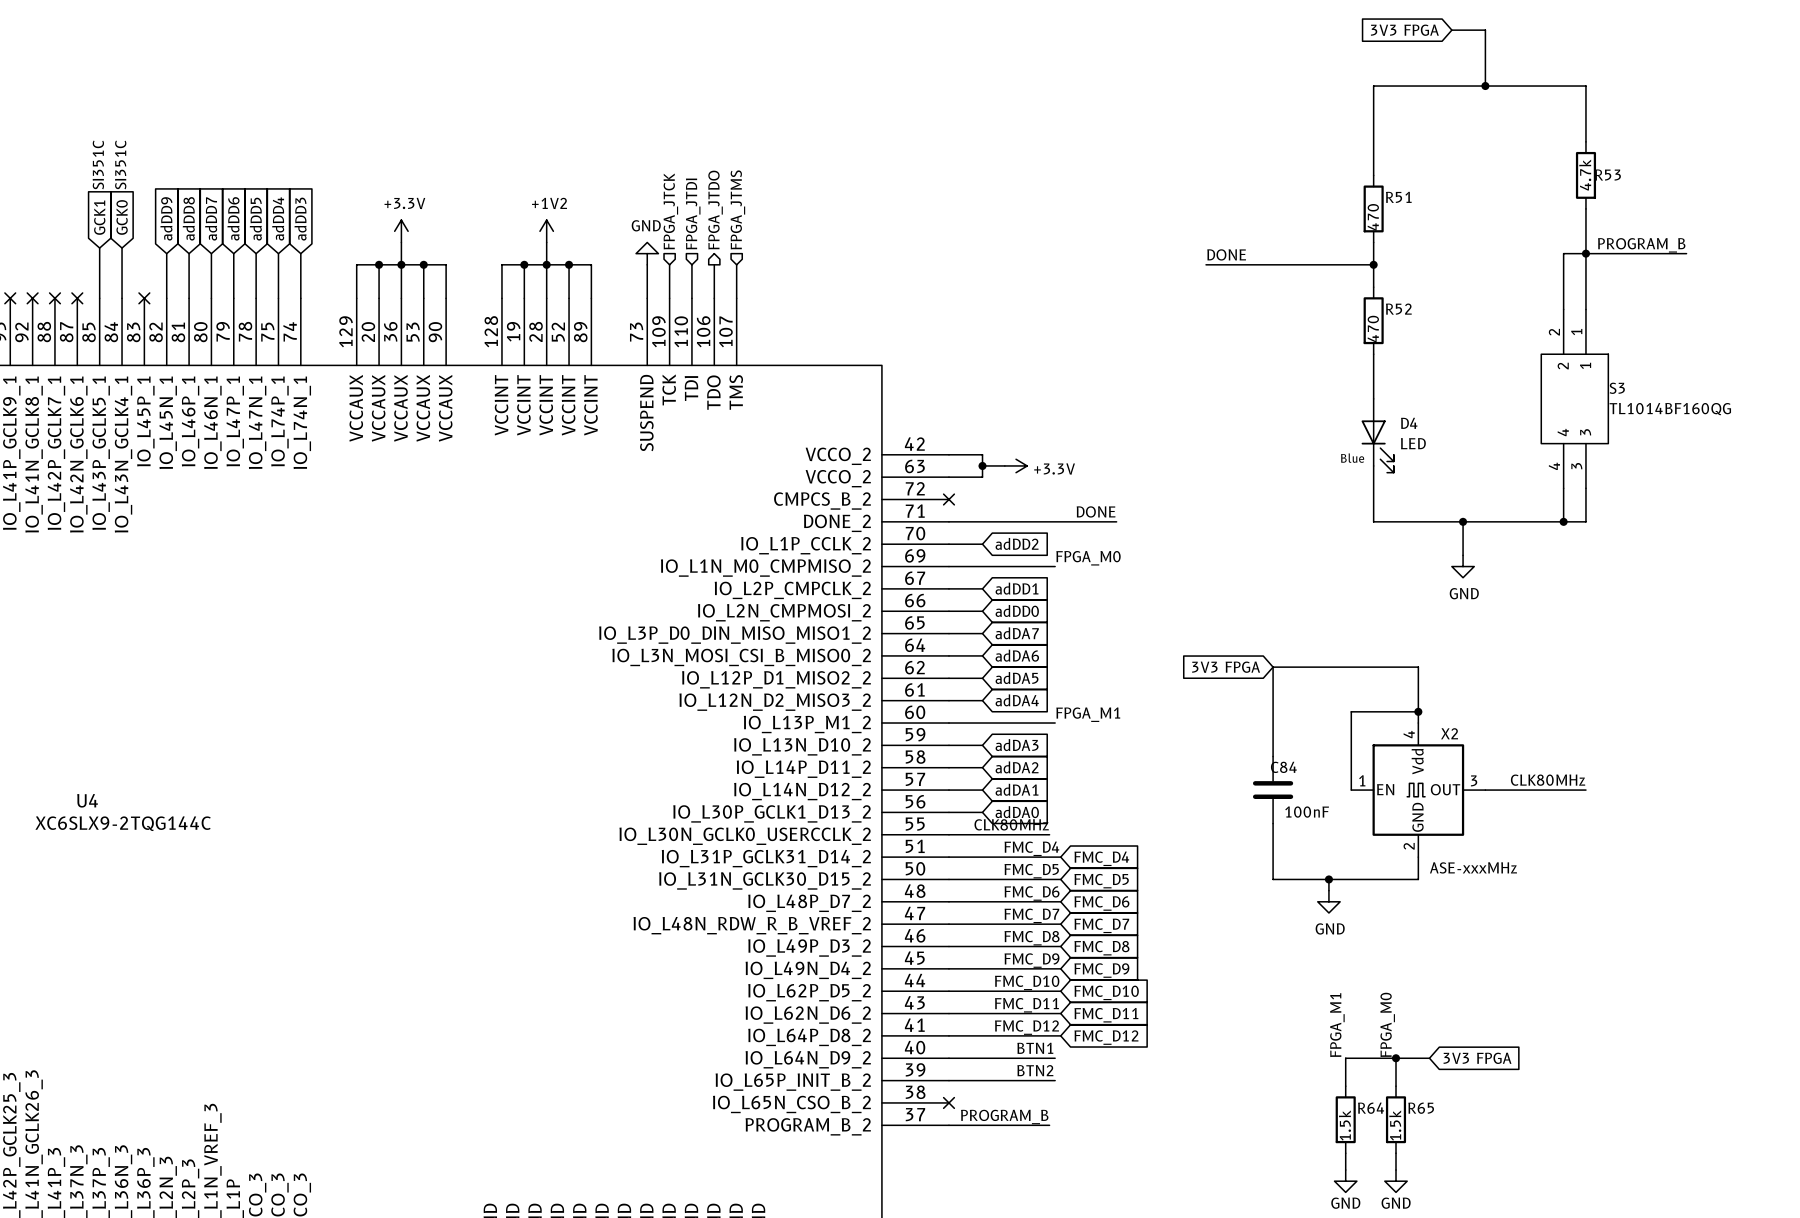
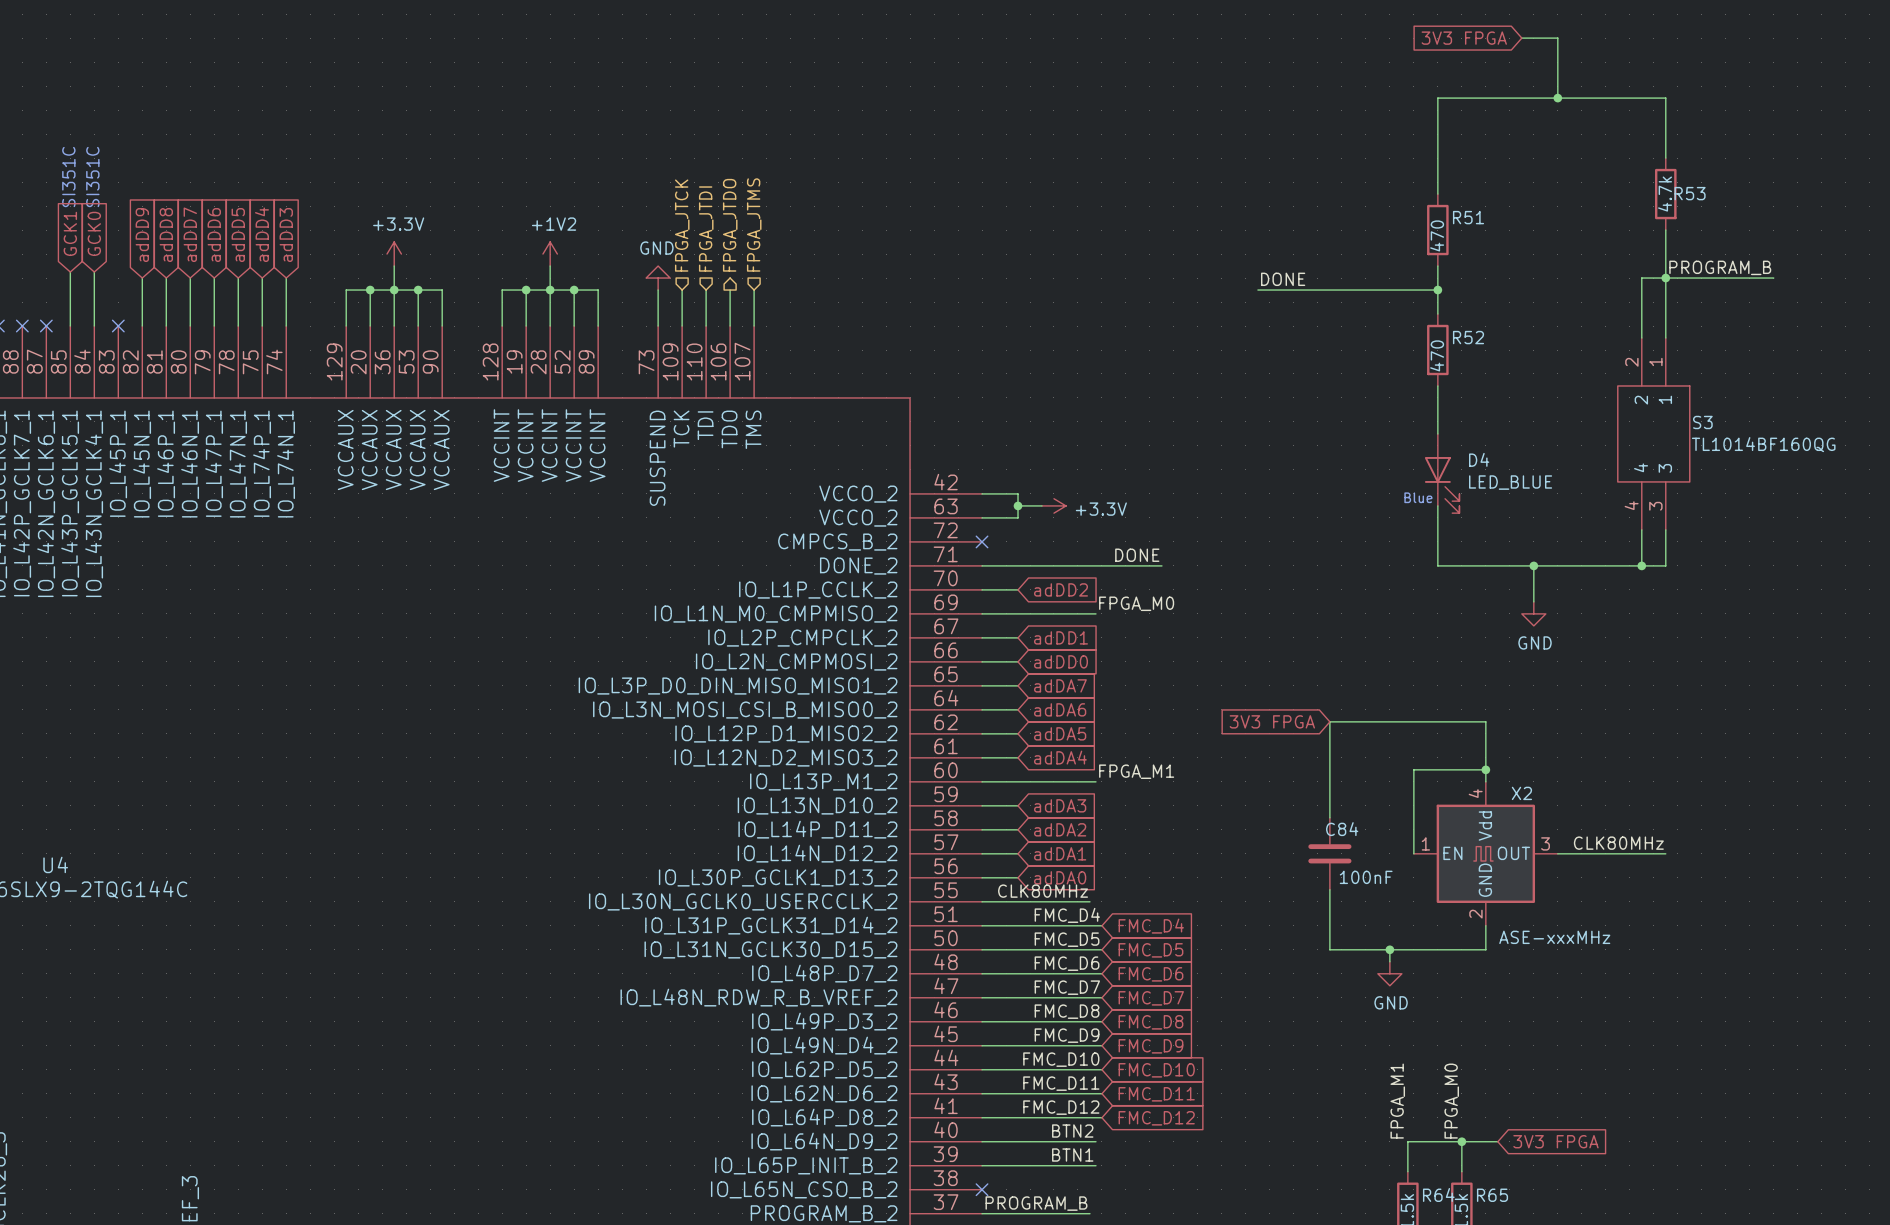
D4 value: LED (1413, 443) -> LED_BLUE (1510, 482)
label: BTN1 (1035, 1048) -> BTN2 (1072, 1131)
label: BTN2 (1035, 1070) -> BTN1 (1072, 1155)

